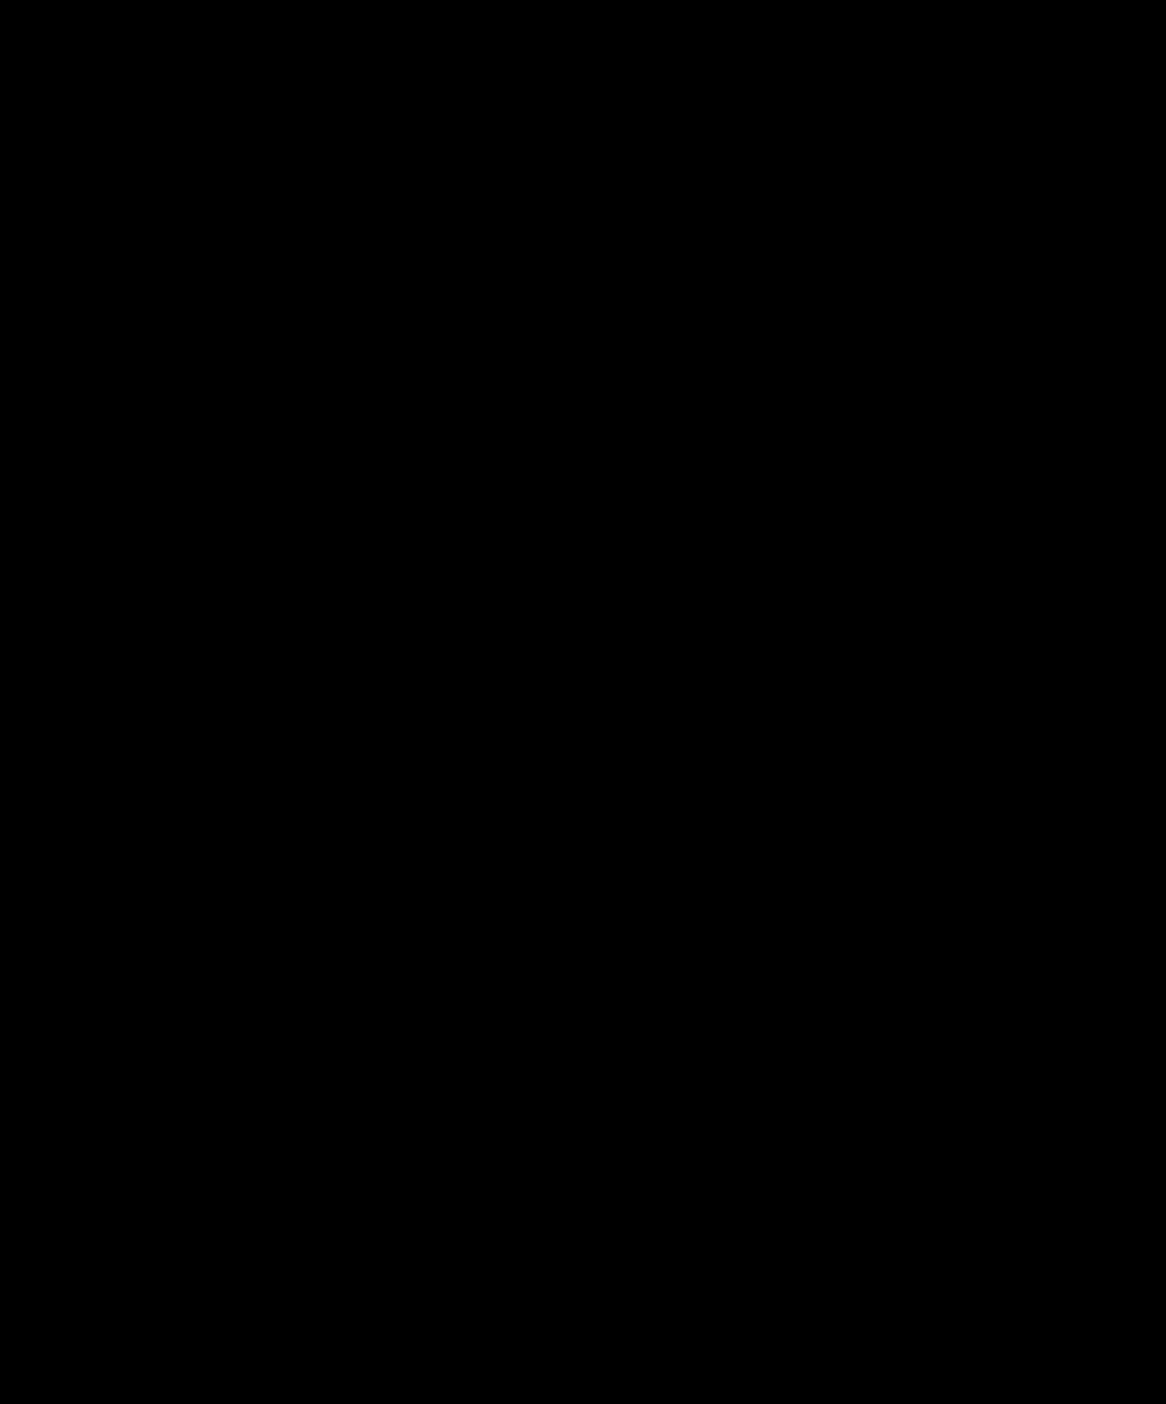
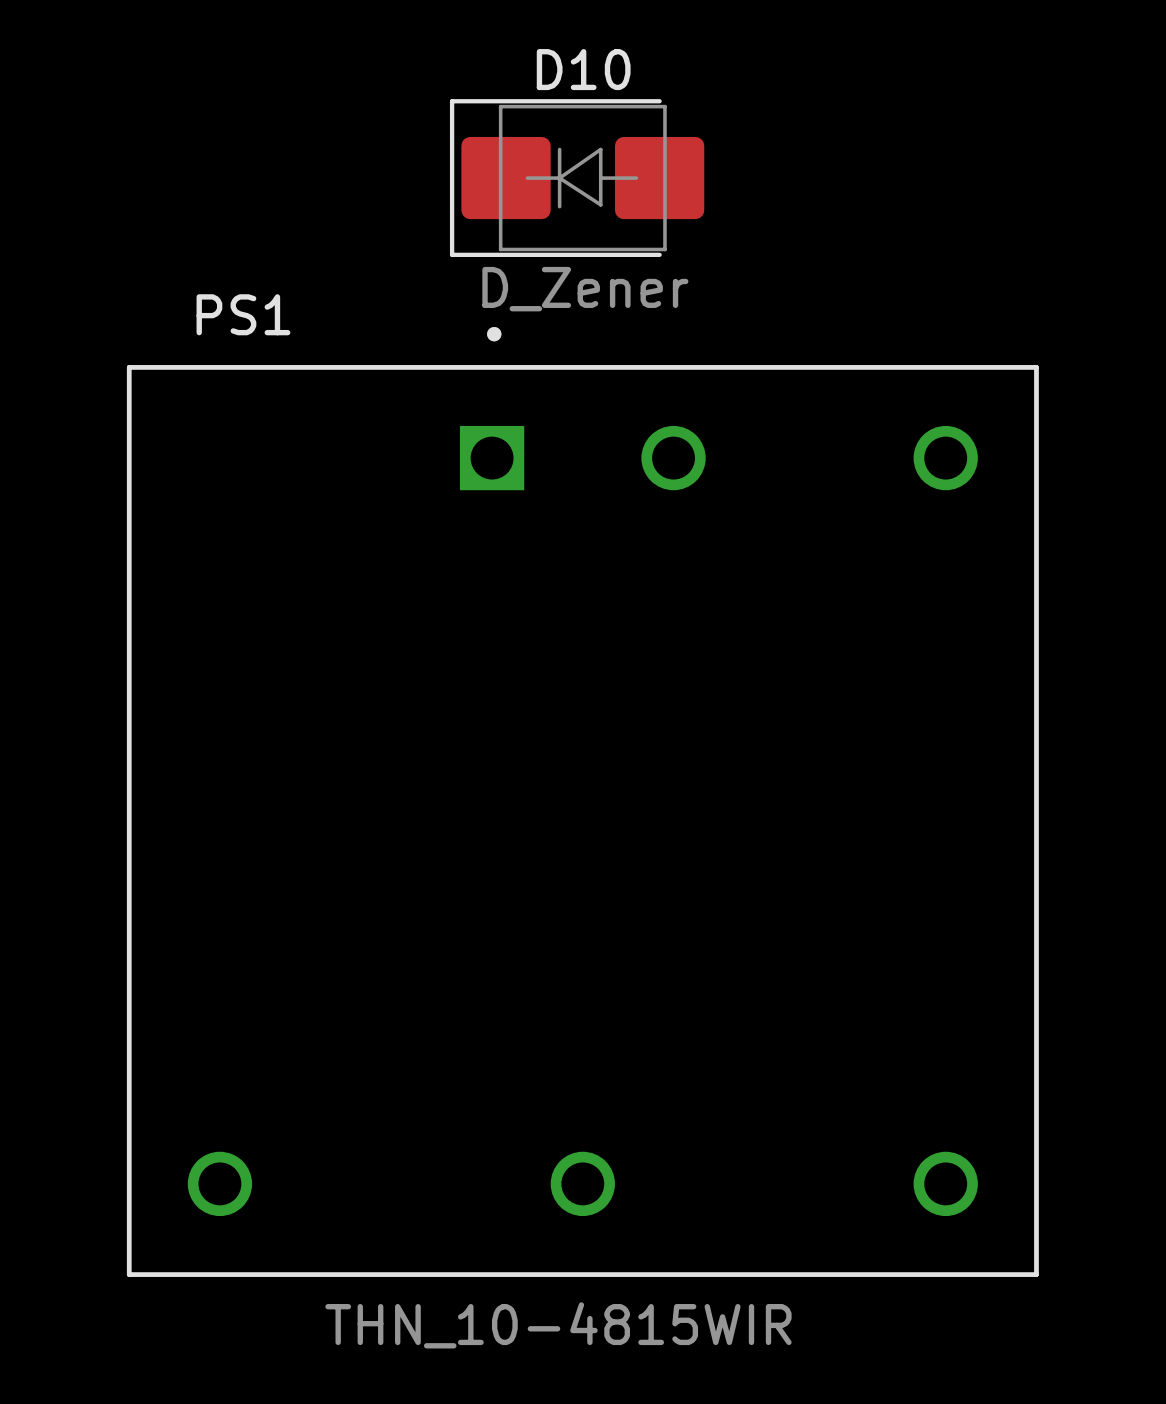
D10: none -> D_Zener (577, 178)
PS1: none -> THN_10-4815WIR (582, 801)

